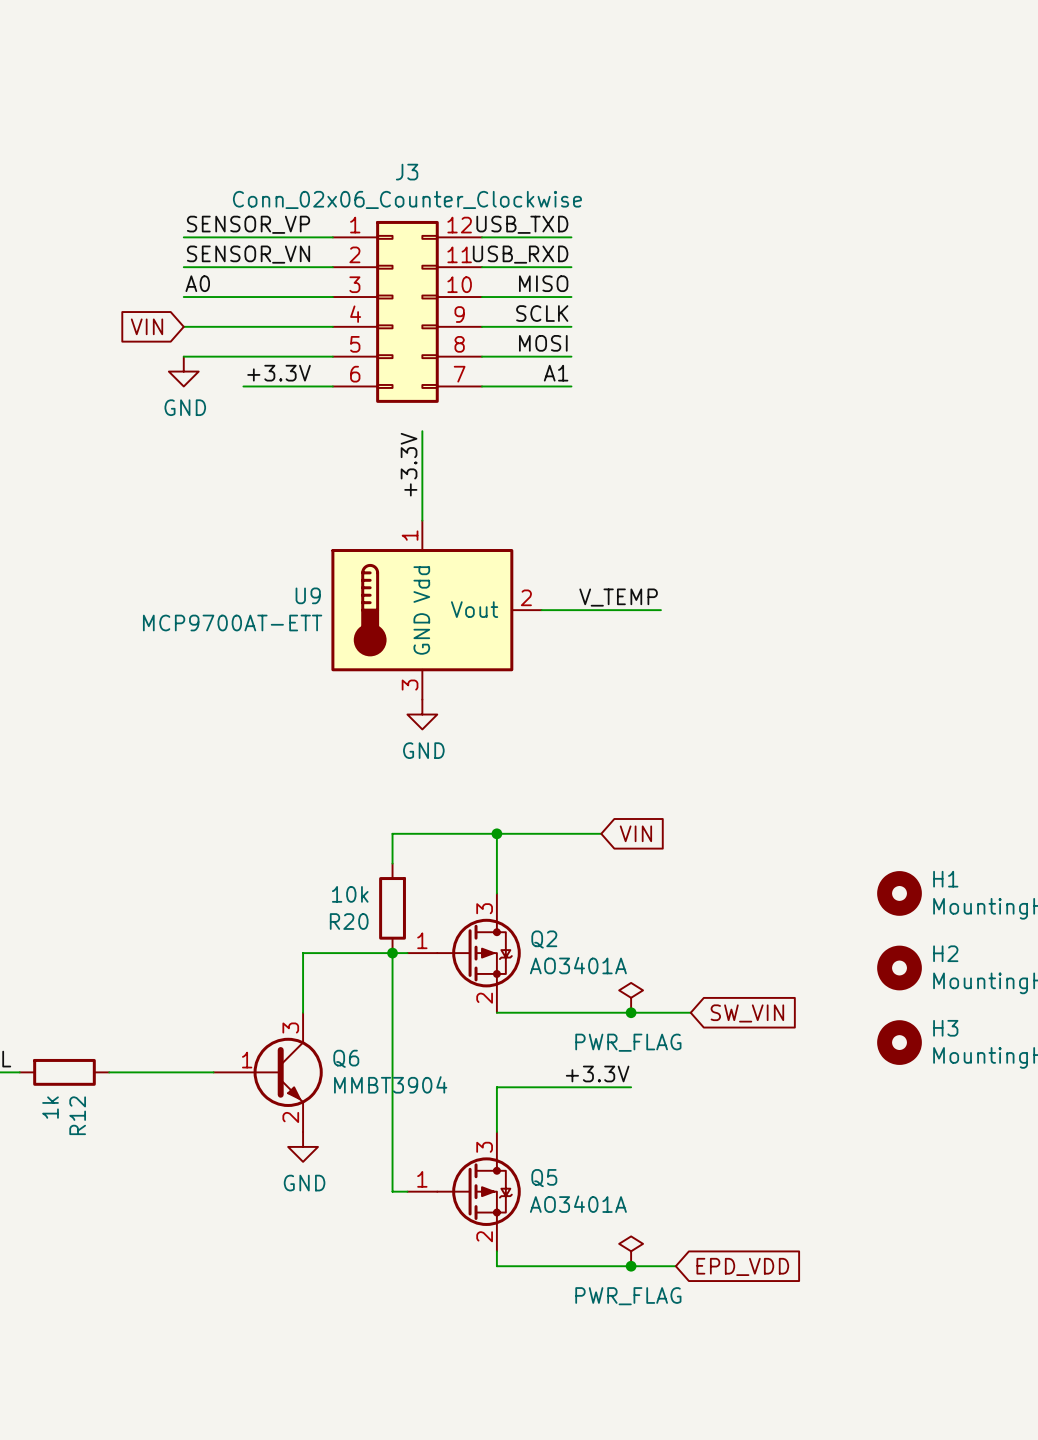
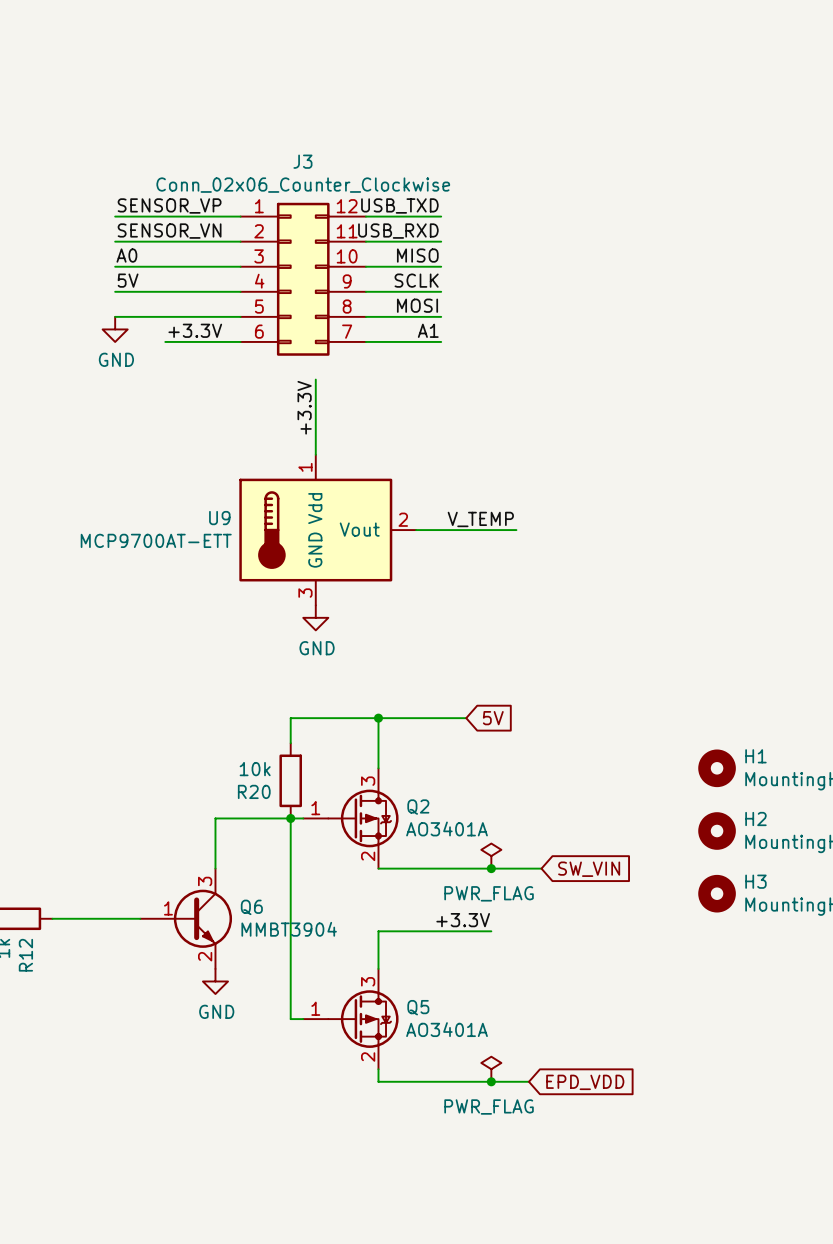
label: none -> 5V (128, 280)
global label: VIN (147, 326) -> none
global label: VIN (635, 833) -> 5V (493, 718)

